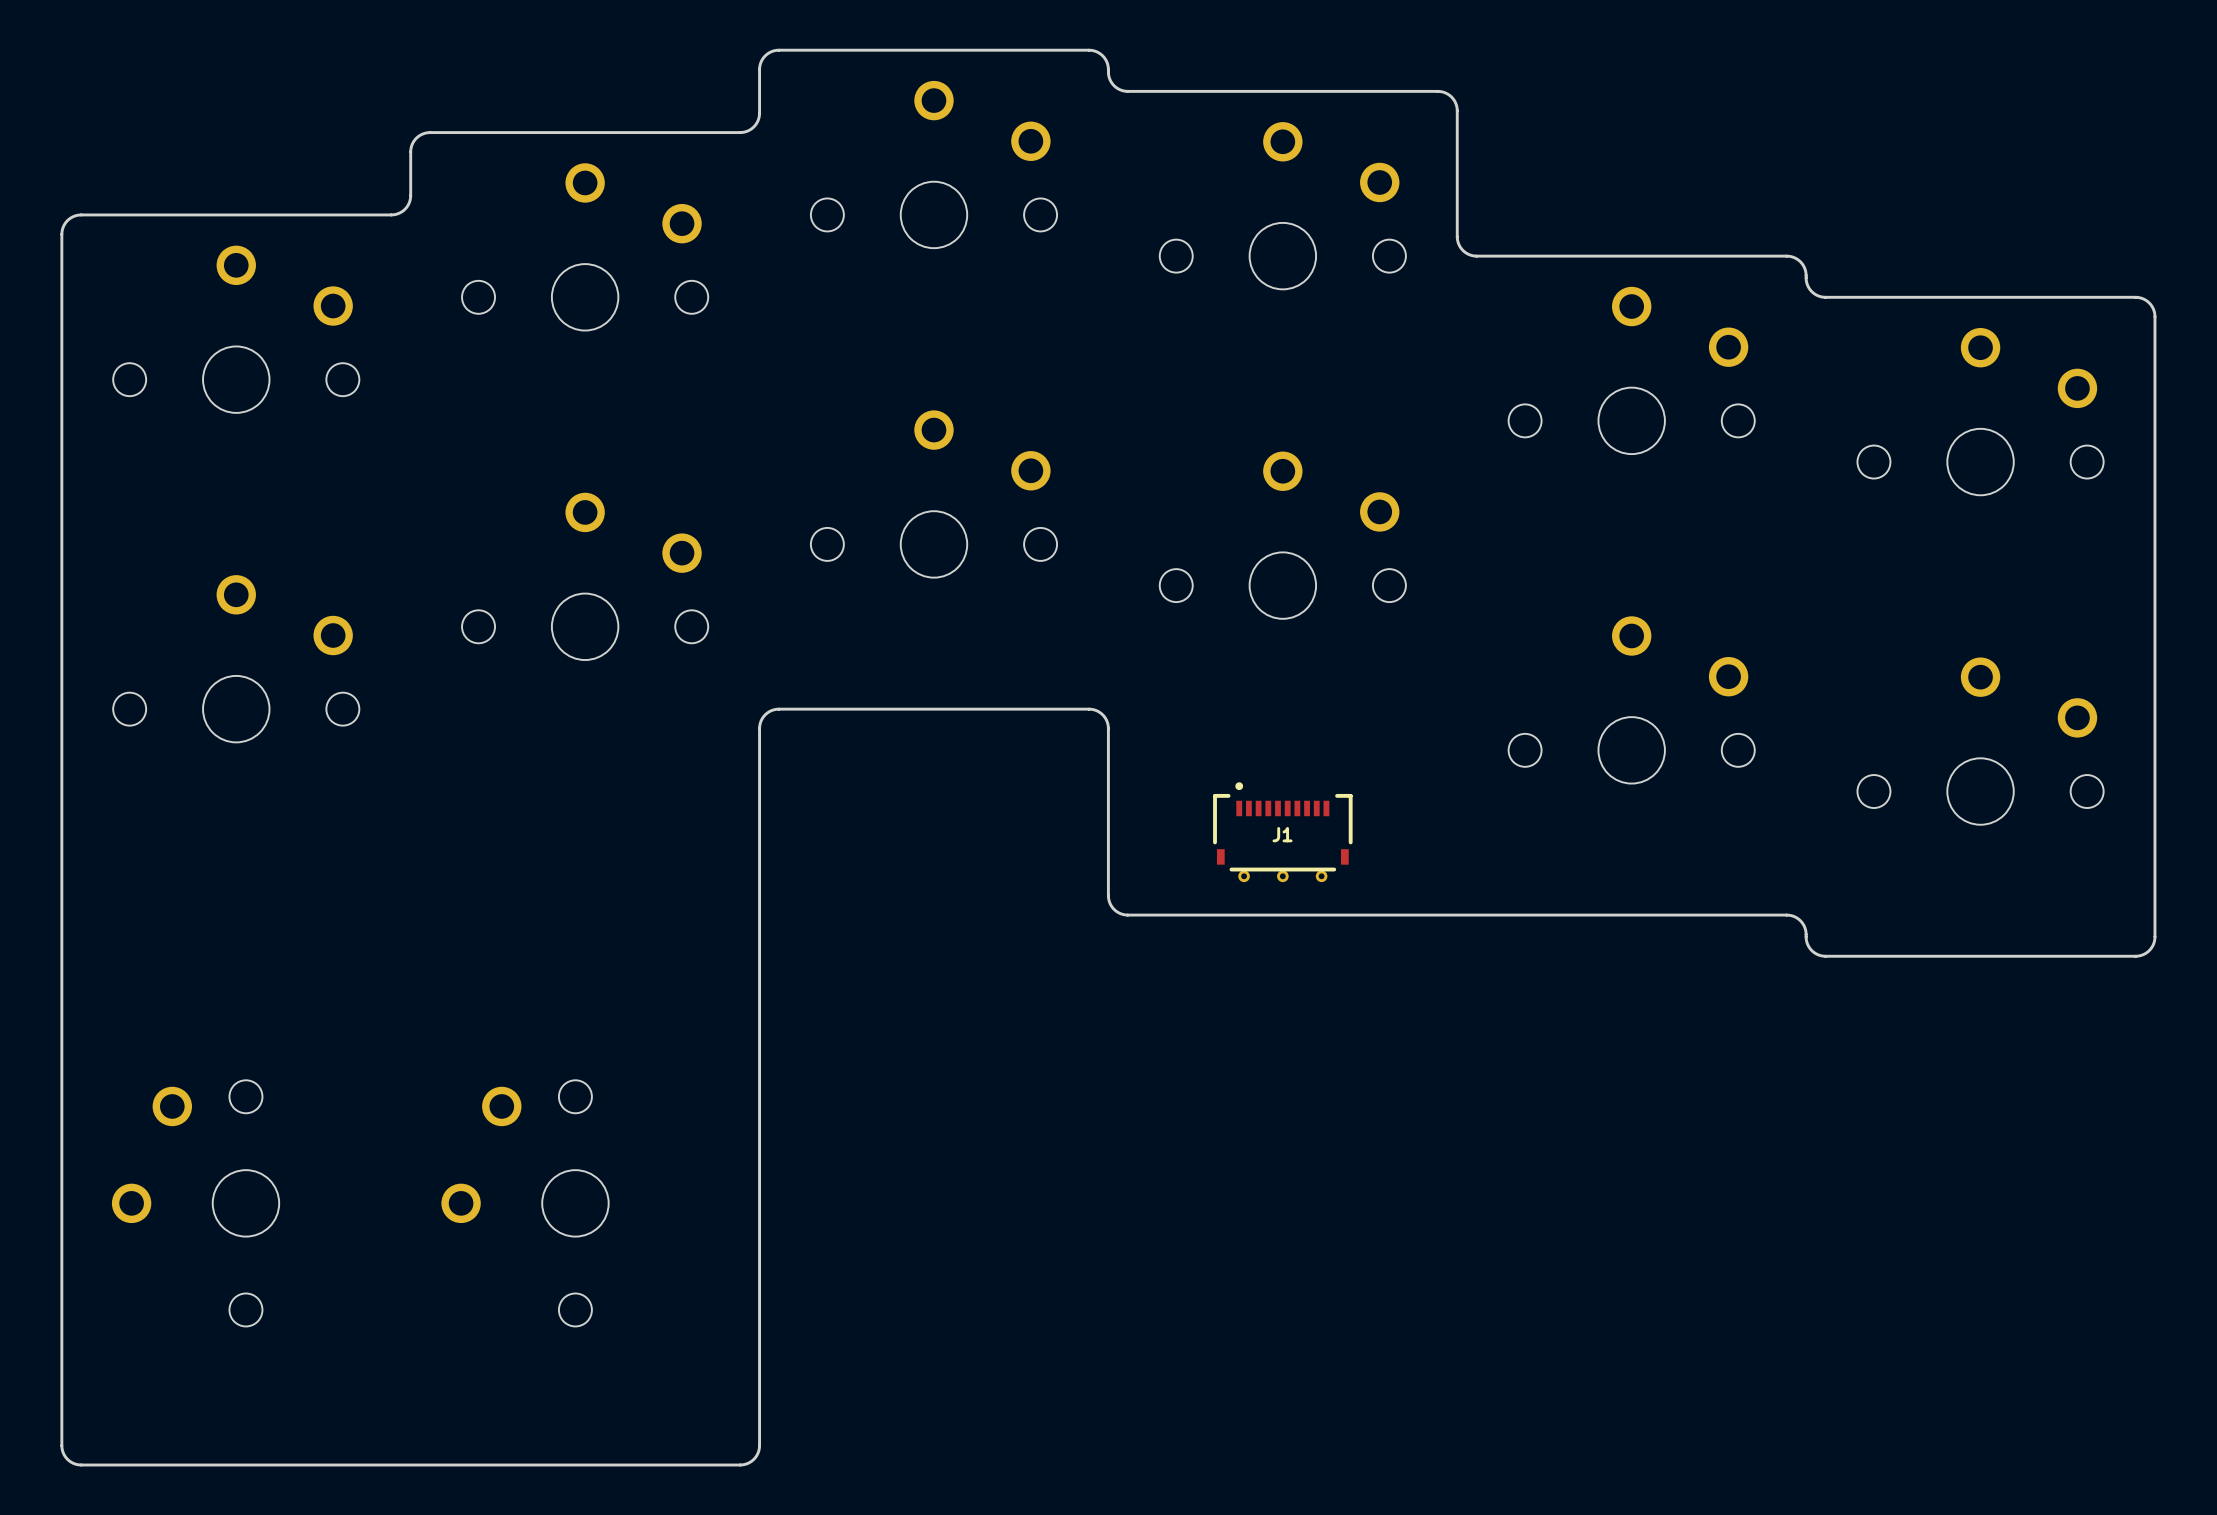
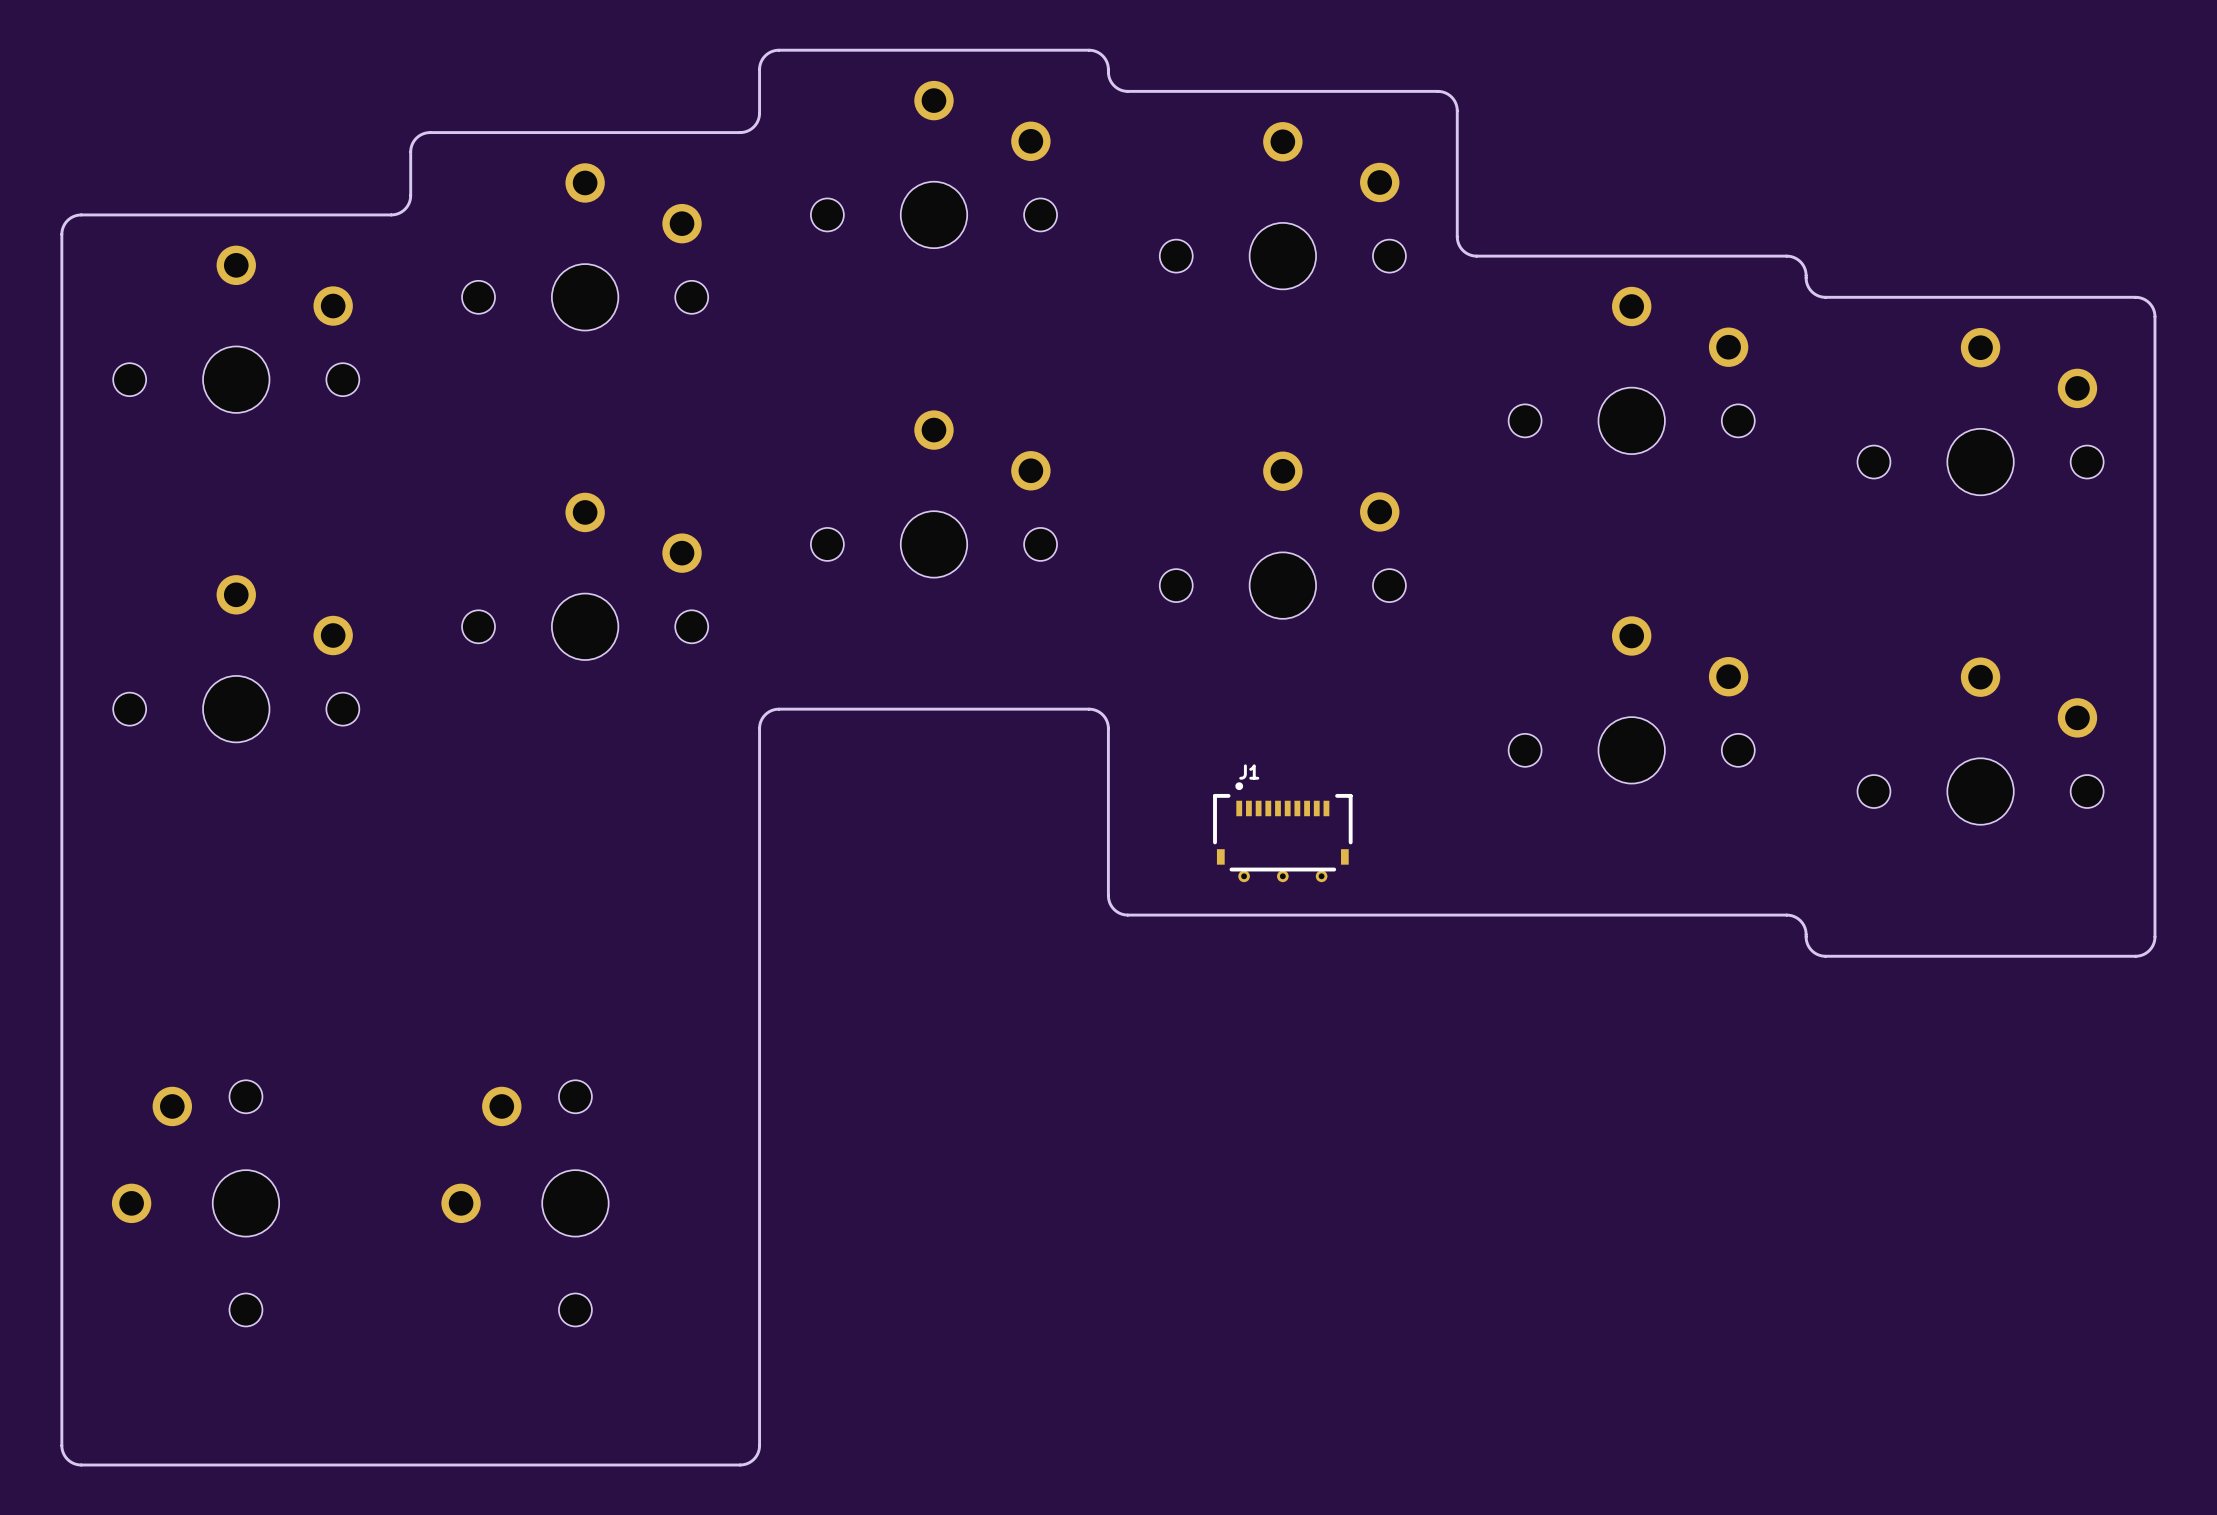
J1 name position: J1 (1282, 834) -> J1 (1249, 772)

